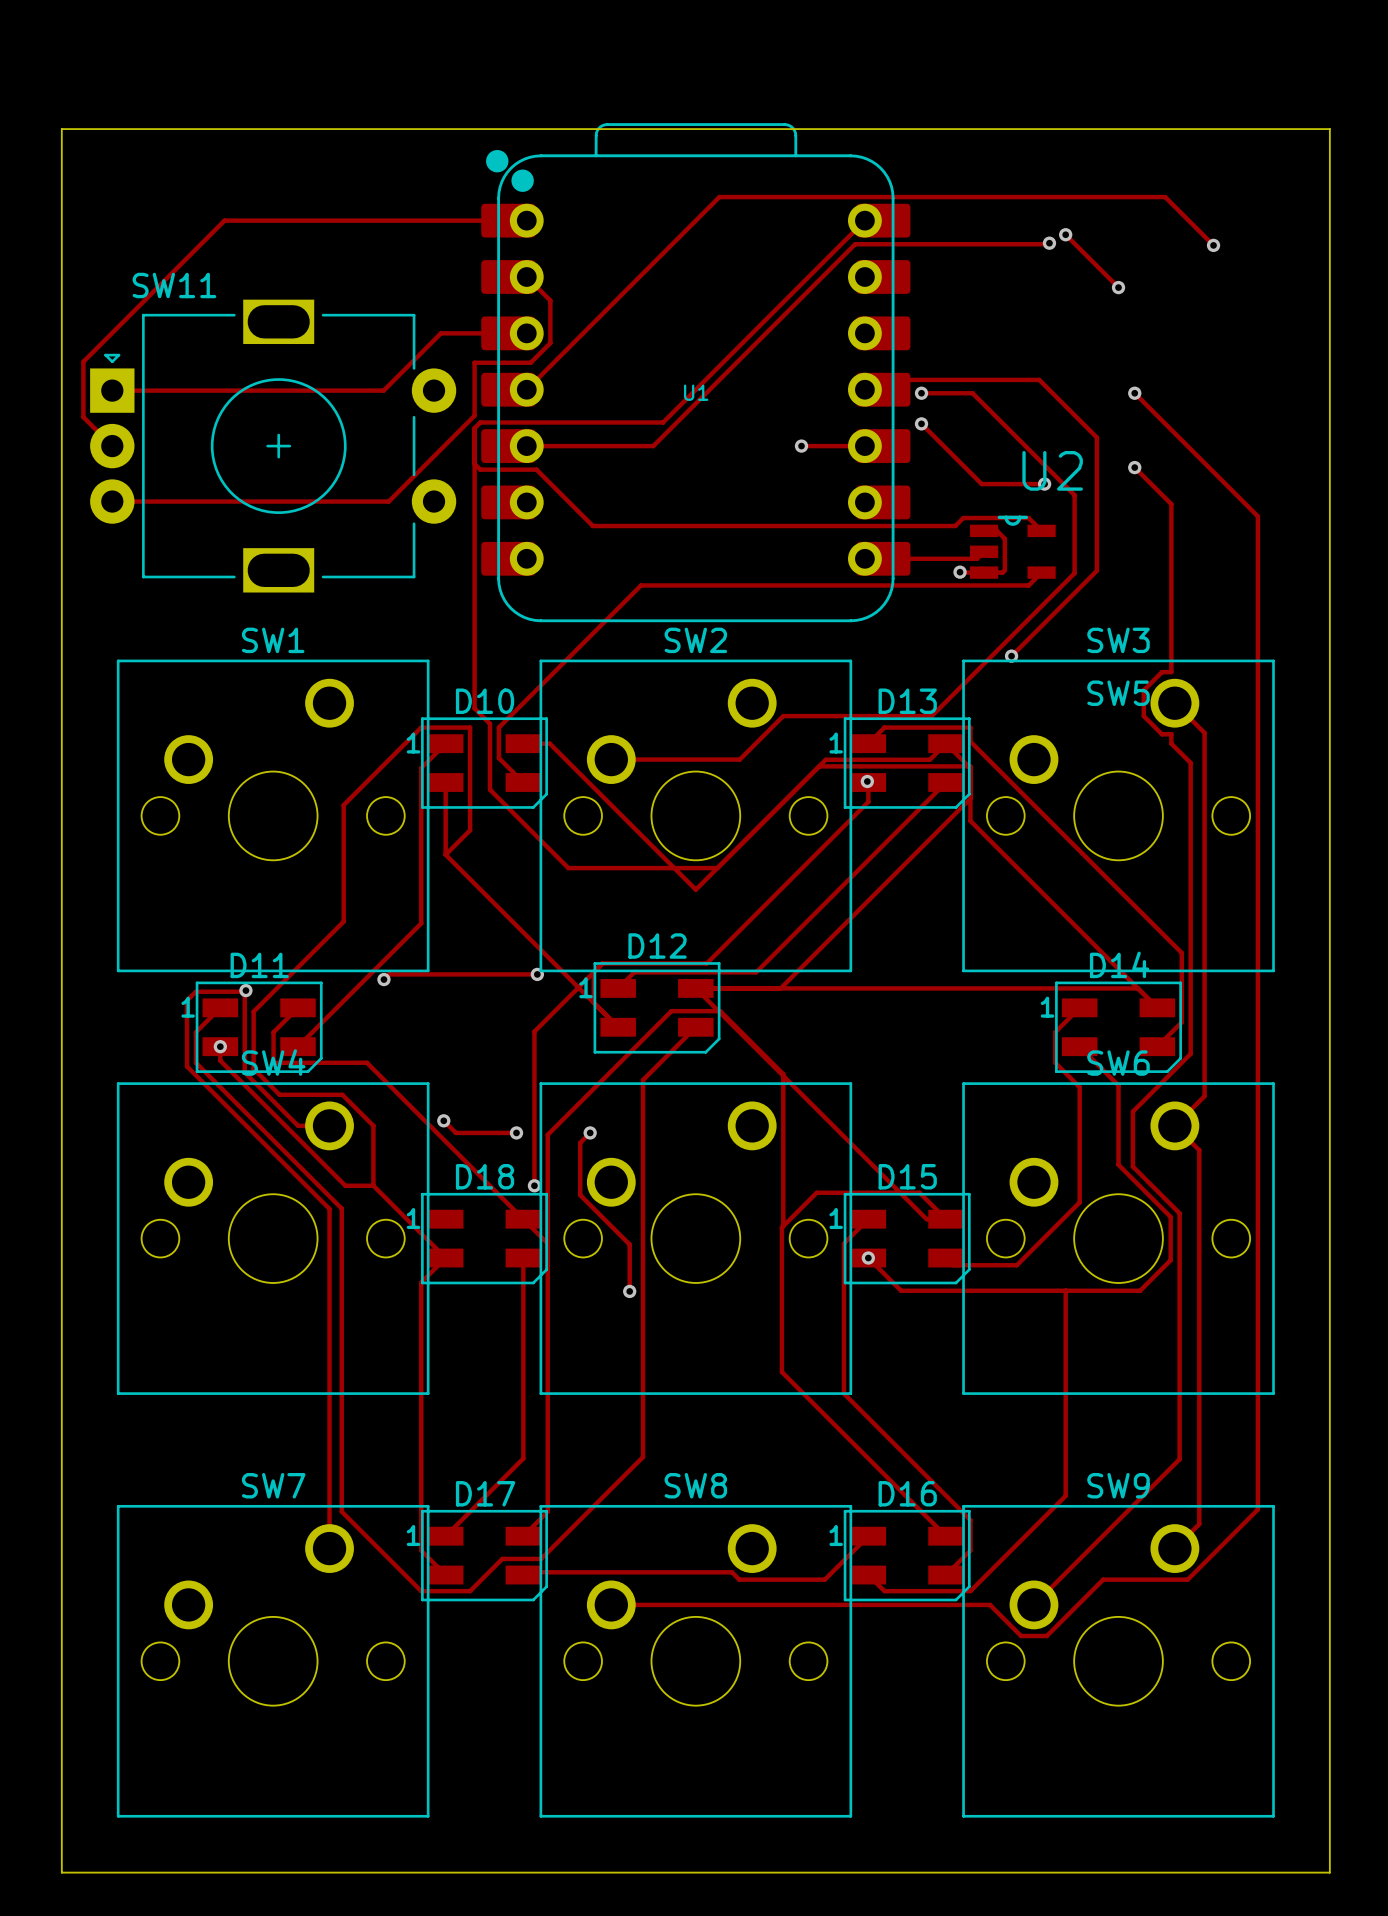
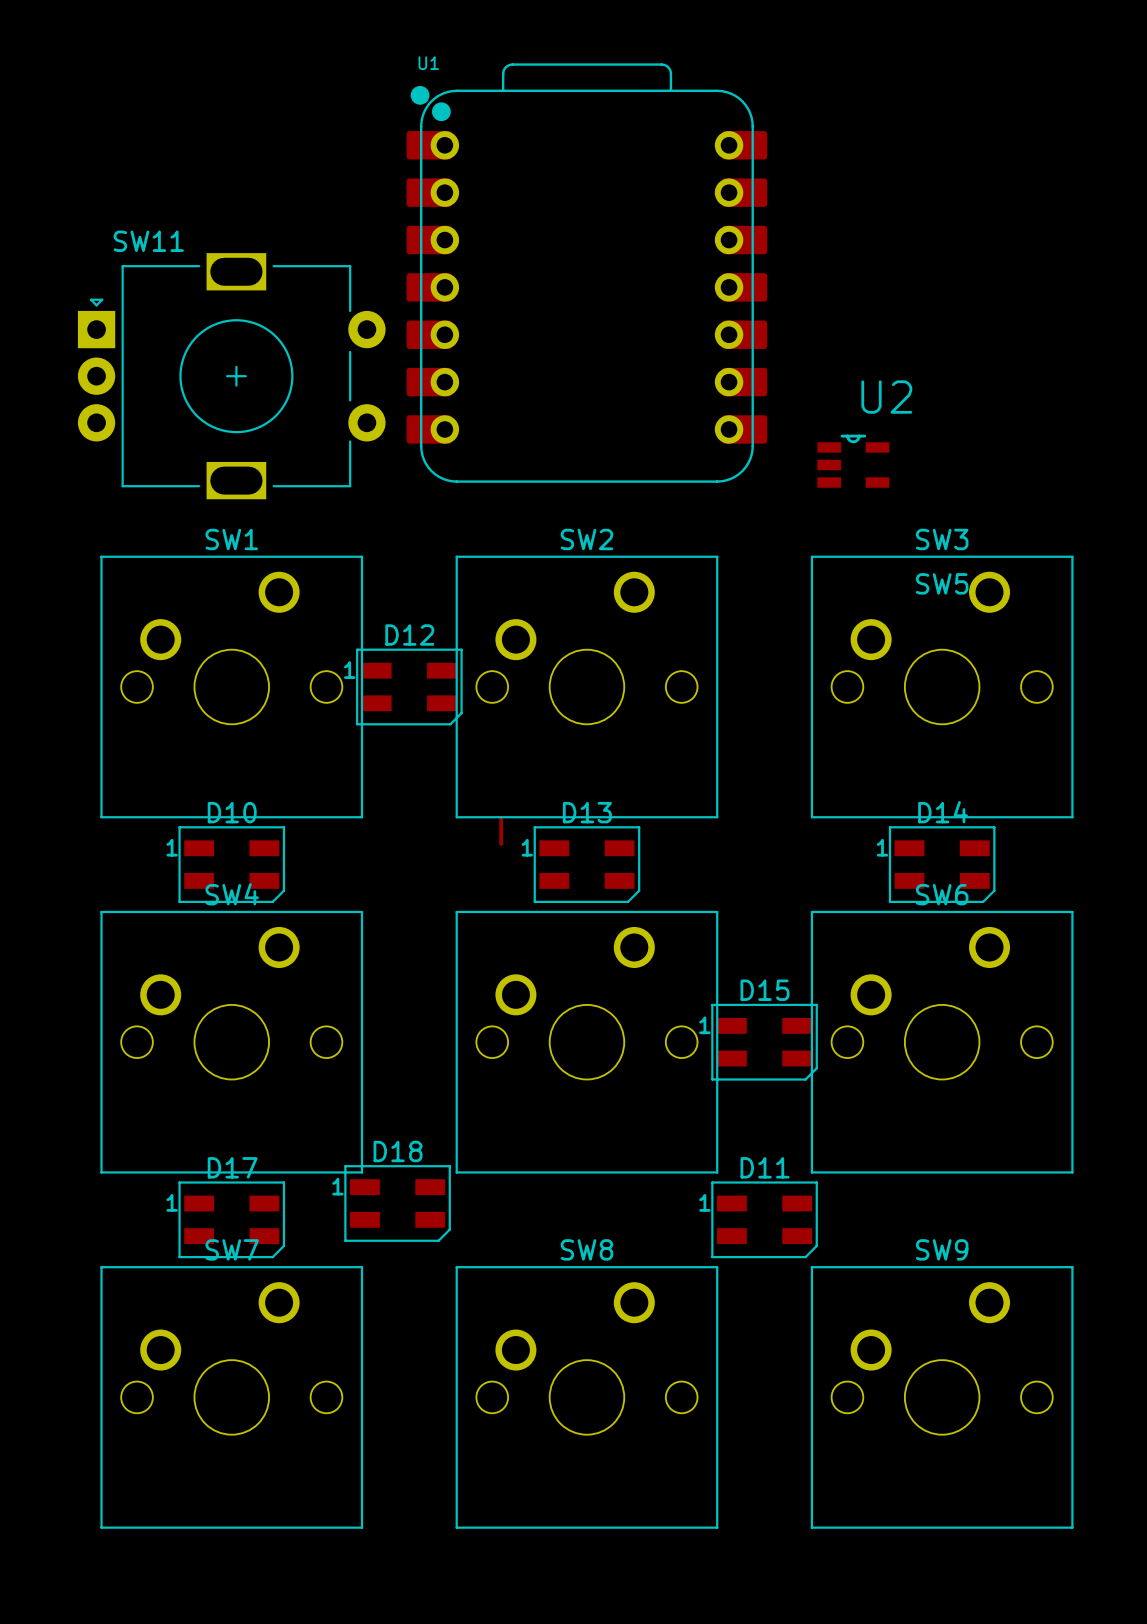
board edge: (61, 129) (1329, 129) (1329, 1872) (61, 1872) (61, 129) -> none
track: (526, 220) (224, 220) (83, 361) (83, 417) (112, 446) -> none
track: (864, 220) (663, 422) (480, 422) (474, 428) (474, 708) (490, 723) (490, 789) (568, 868) (717, 868) -> none
track: (1065, 234) (1118, 287) -> none
via: (1065, 234) -> none
track: (1049, 243) (855, 244) (653, 446) (526, 446) -> none
via: (1049, 243) -> none
track: (1213, 245) (1165, 197) (719, 197) (526, 389) -> none
via: (1213, 245) -> none
track: (526, 277) (550, 300) (550, 343) (530, 362) (474, 362) (474, 415) (388, 501) (112, 501) -> none
via: (1118, 287) -> none
track: (526, 333) (440, 333) (383, 390) (112, 390) -> none
U1 position: (695, 372) -> (586, 273)
track: (864, 389) (874, 379) (1039, 379) (1096, 437) (1096, 570) (1011, 656) -> none
U1 name position: U1 (696, 392) -> U1 (428, 63)
track: (921, 393) (972, 393) (1074, 495) (1074, 573) (931, 716) (783, 716) (739, 759) (611, 759) -> none
via: (921, 393) -> none
track: (1134, 393) (1257, 516) (1257, 1509) (1187, 1579) (1103, 1579) (1046, 1636) (1021, 1636) (990, 1604) (611, 1604) -> none
via: (1134, 393) -> none
track: (921, 423) (981, 484) (1044, 484) -> none
via: (921, 423) -> none
track: (801, 446) (864, 446) -> none
via: (801, 446) -> none
track: (474, 463) (480, 469) (536, 469) (592, 526) (955, 526) (963, 518) (1028, 518) (1041, 530) -> none
track: (1134, 467) (1171, 504) (1171, 672) (1162, 672) (1143, 690) (1143, 716) (1162, 734) (1171, 734) (1171, 743) (1190, 762) (1190, 1053) (1132, 1111) (1132, 1166) (1179, 1213) (1179, 1459) (1033, 1604) -> none
via: (1134, 467) -> none
via: (1044, 484) -> none
track: (984, 530) (996, 530) (1004, 538) (1004, 570) (1002, 572) (960, 572) -> none
track: (984, 551) (977, 558) (864, 558) -> none
via: (960, 572) -> none
track: (1041, 572) (1028, 585) (640, 585) (498, 727) (498, 758) (523, 782) -> none
via: (1011, 656) -> none
track: (1174, 703) (1204, 732) (1204, 1096) (1174, 1125) (1199, 1150) (1199, 1524) (1174, 1548) -> none
track: (445, 743) (421, 768) (421, 923) (297, 1046) -> none
track: (523, 743) (549, 743) (695, 889) (825, 759) (929, 759) (946, 743) (970, 768) -> none
track: (868, 743) (884, 727) (970, 727) (970, 741) (1181, 952) (1181, 1022) (1157, 1046) -> none
D10 position: (484, 763) -> (231, 864)
D13 position: (907, 763) -> (586, 864)
track: (819, 766) (970, 766) (970, 820) (1157, 1007) -> none
via: (867, 781) -> none
track: (445, 782) (445, 854) -> none
track: (868, 782) (868, 801) (706, 963) (602, 963) (534, 1031) (534, 1185) -> none
track: (946, 782) (756, 972) (634, 972) (618, 988) -> none
track: (970, 798) (780, 988) -> none
track: (445, 854) (618, 1027) -> none
track: (445, 854) (470, 830) (470, 727) (421, 727) (343, 805) (343, 921) (253, 1011) (253, 1068) (279, 1094) (342, 1094) (373, 1125) (373, 1185) -> none
track: (537, 974) (389, 974) (383, 979) -> none
via: (537, 974) -> none
via: (383, 979) -> none
track: (1137, 988) (695, 988) (926, 1219) (946, 1219) (919, 1192) (816, 1192) (781, 1227) (781, 1372) (946, 1536) -> none
via: (245, 990) -> none
track: (220, 1007) (195, 1032) (195, 1062) (341, 1208) (341, 1511) (421, 1591) (470, 1591) (502, 1558) (541, 1558) (643, 1457) (643, 1080) (695, 1027) -> none
track: (297, 1007) (273, 1032) (273, 1062) (366, 1062) (547, 1243) -> none
D12 position: (657, 1007) -> (409, 686)
track: (1079, 1007) (1055, 1032) (1055, 1062) (1079, 1087) (1079, 1202) (1016, 1265) (953, 1265) (946, 1258) -> none
D11 position: (259, 1027) -> (764, 1219)
track: (220, 1046) (220, 1060) (345, 1185) (373, 1185) -> none
via: (220, 1046) -> none
track: (1079, 1046) (1118, 1085) (1118, 1164) (1170, 1216) (1170, 1260) (1140, 1290) (901, 1290) (868, 1258) -> none
track: (443, 1120) (455, 1132) (516, 1132) -> none
via: (443, 1120) -> none
track: (329, 1125) (298, 1125) (244, 1072) (244, 991) (195, 991) (187, 1000) (187, 1066) (329, 1208) (329, 1548) -> none
via: (516, 1132) -> none
track: (590, 1132) (580, 1142) (580, 1195) (629, 1244) (629, 1291) -> none
via: (590, 1132) -> none
track: (373, 1185) (445, 1258) (421, 1282) (421, 1550) (445, 1575) -> none
via: (534, 1185) -> none
track: (868, 1219) (843, 1243) (843, 1393) (970, 1520) (970, 1550) (946, 1575) -> none
track: (783, 1226) (783, 1074) (720, 1011) (671, 1011) (547, 1134) (547, 1511) (523, 1536) -> none
D18 position: (484, 1238) -> (397, 1203)
track: (523, 1258) (523, 1458) (445, 1536) -> none
via: (868, 1258) -> none
track: (1065, 1290) (1065, 1495) (970, 1591) (884, 1591) (868, 1575) -> none
via: (629, 1291) -> none
track: (868, 1536) (824, 1579) (739, 1579) (731, 1572) (526, 1572) (523, 1575) -> none
D17 position: (484, 1555) -> (231, 1219)
D16: (907, 1555) -> none

